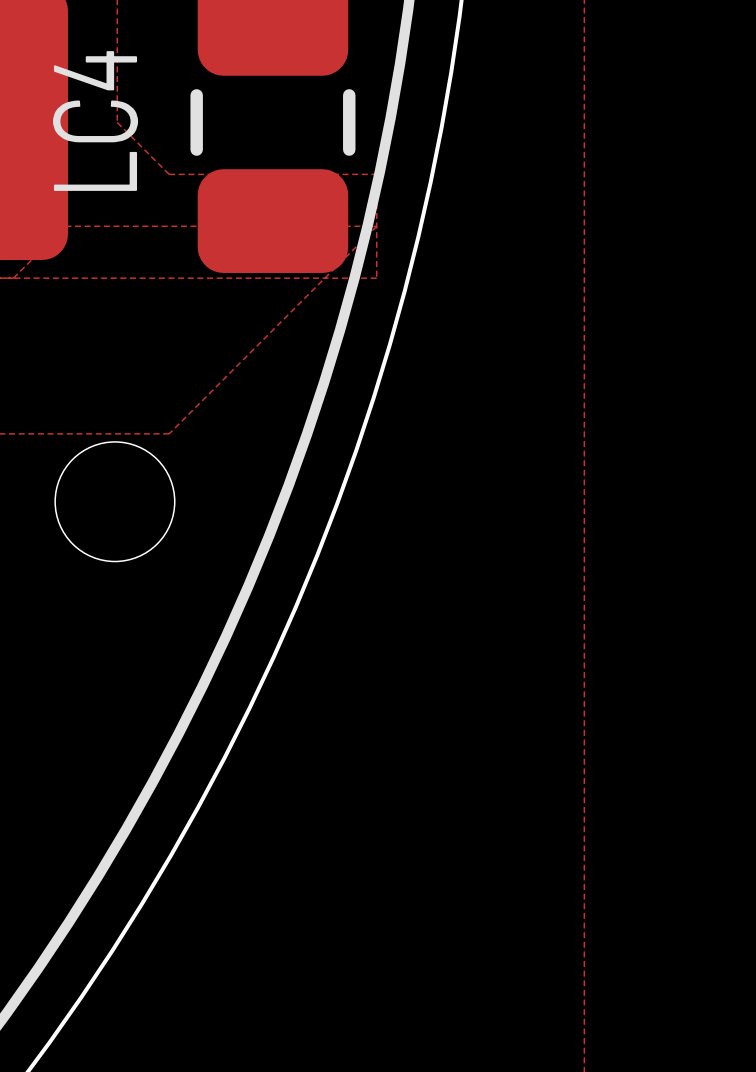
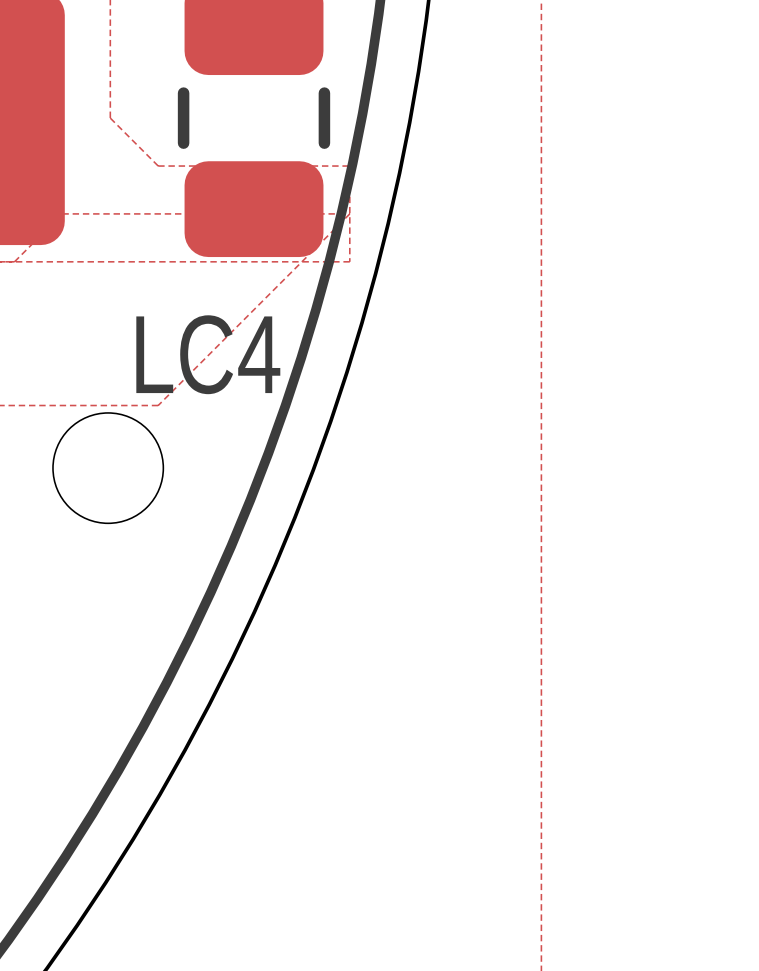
LC4 name rotation: 0° (95, 121) -> 90° clockwise (208, 354)
LC4 name position: LC4 (95, 121) -> LC4 (208, 354)

